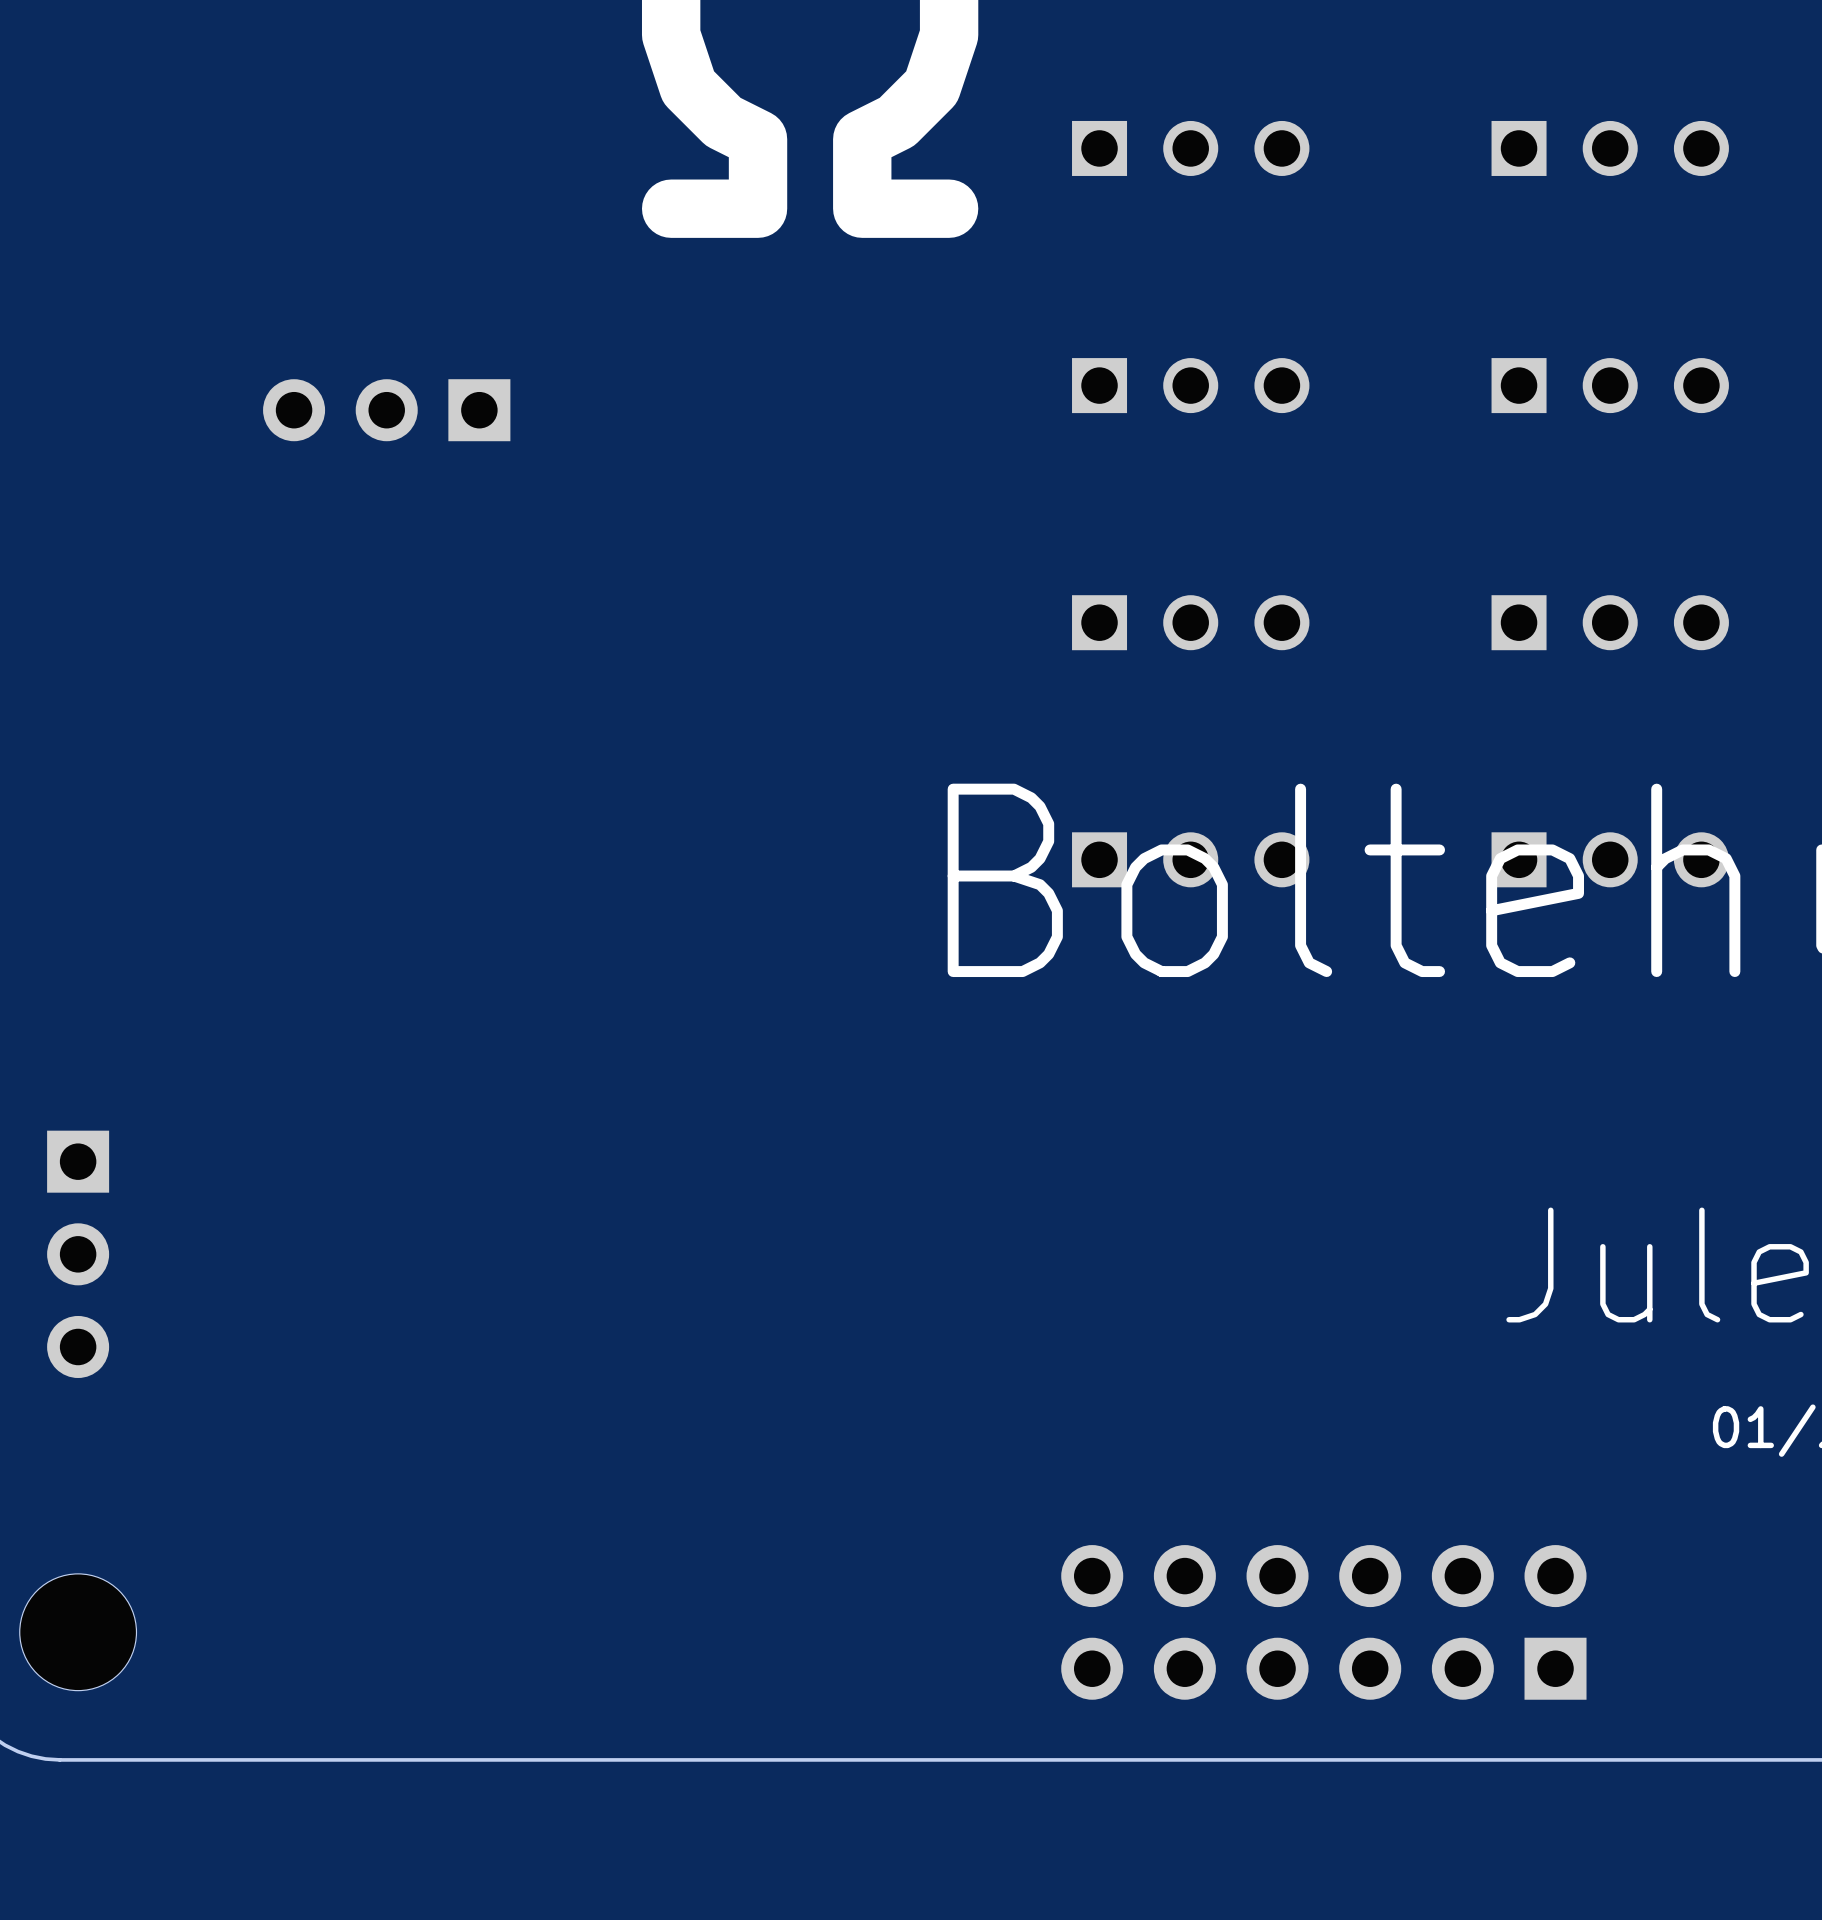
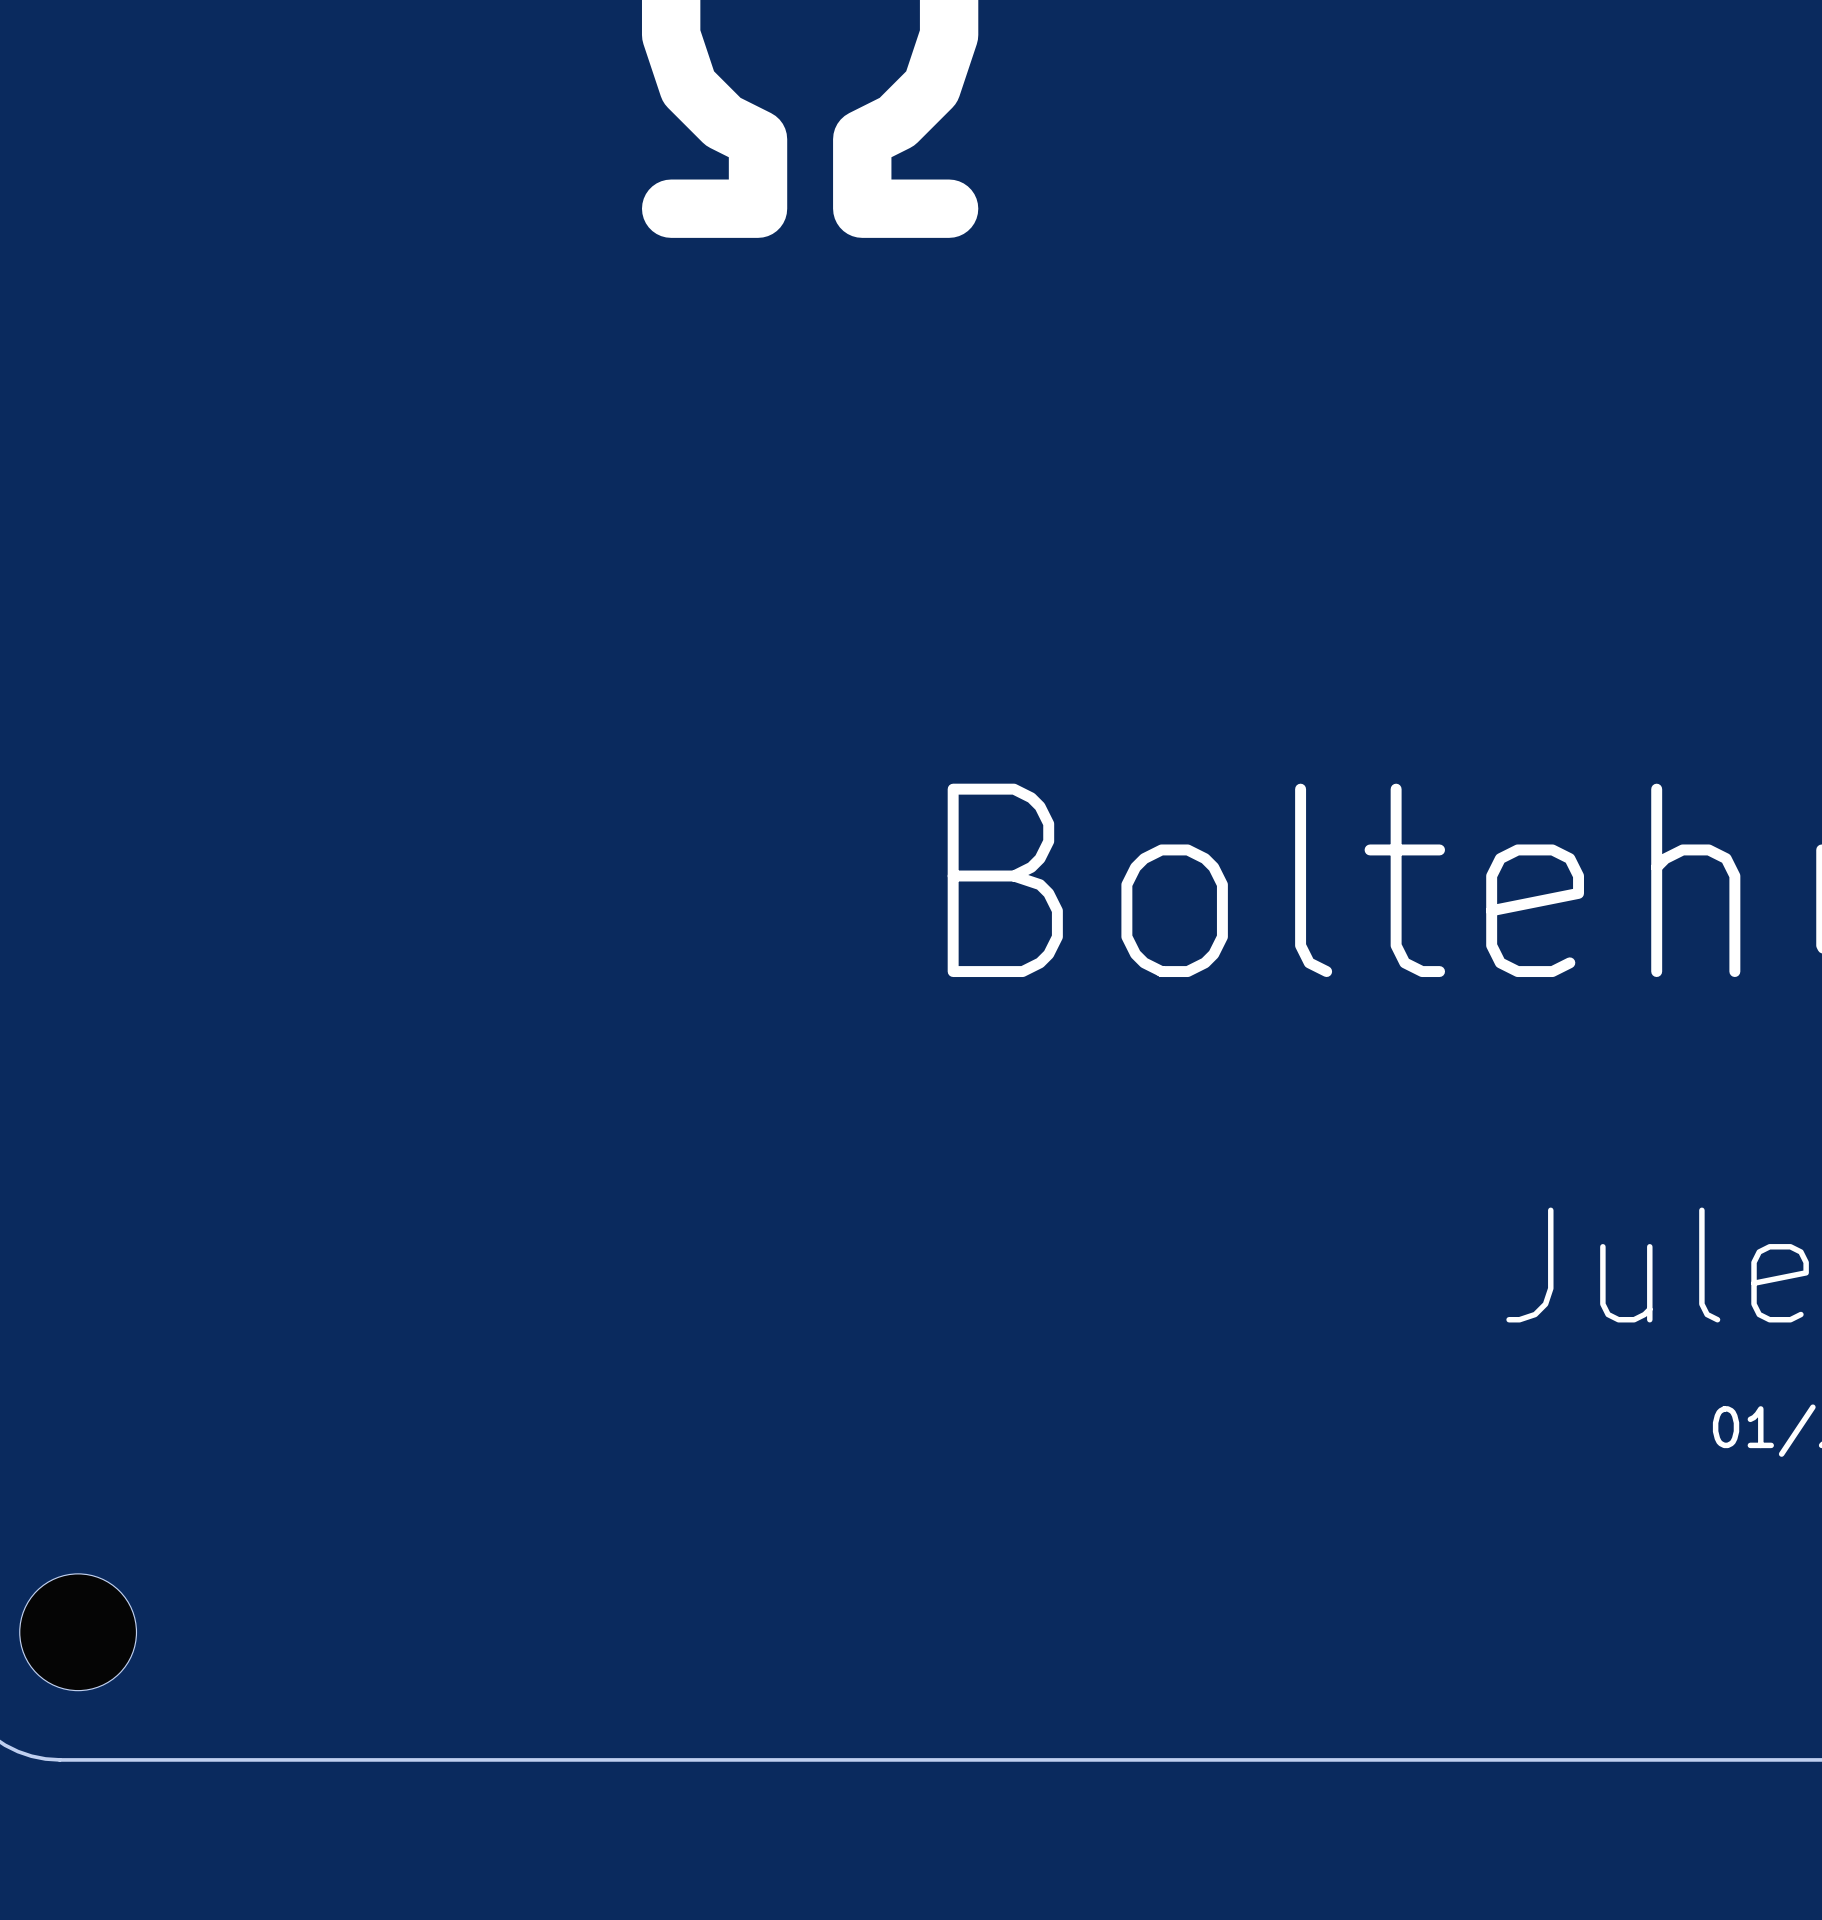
part: (1190, 148) -> none
part: (1610, 148) -> none
part: (1190, 385) -> none
part: (1610, 385) -> none
part: (386, 410) -> none
part: (1190, 622) -> none
part: (1610, 622) -> none
part: (1190, 859) -> none
part: (1610, 859) -> none
part: (78, 1254) -> none
part: (1323, 1622) -> none

